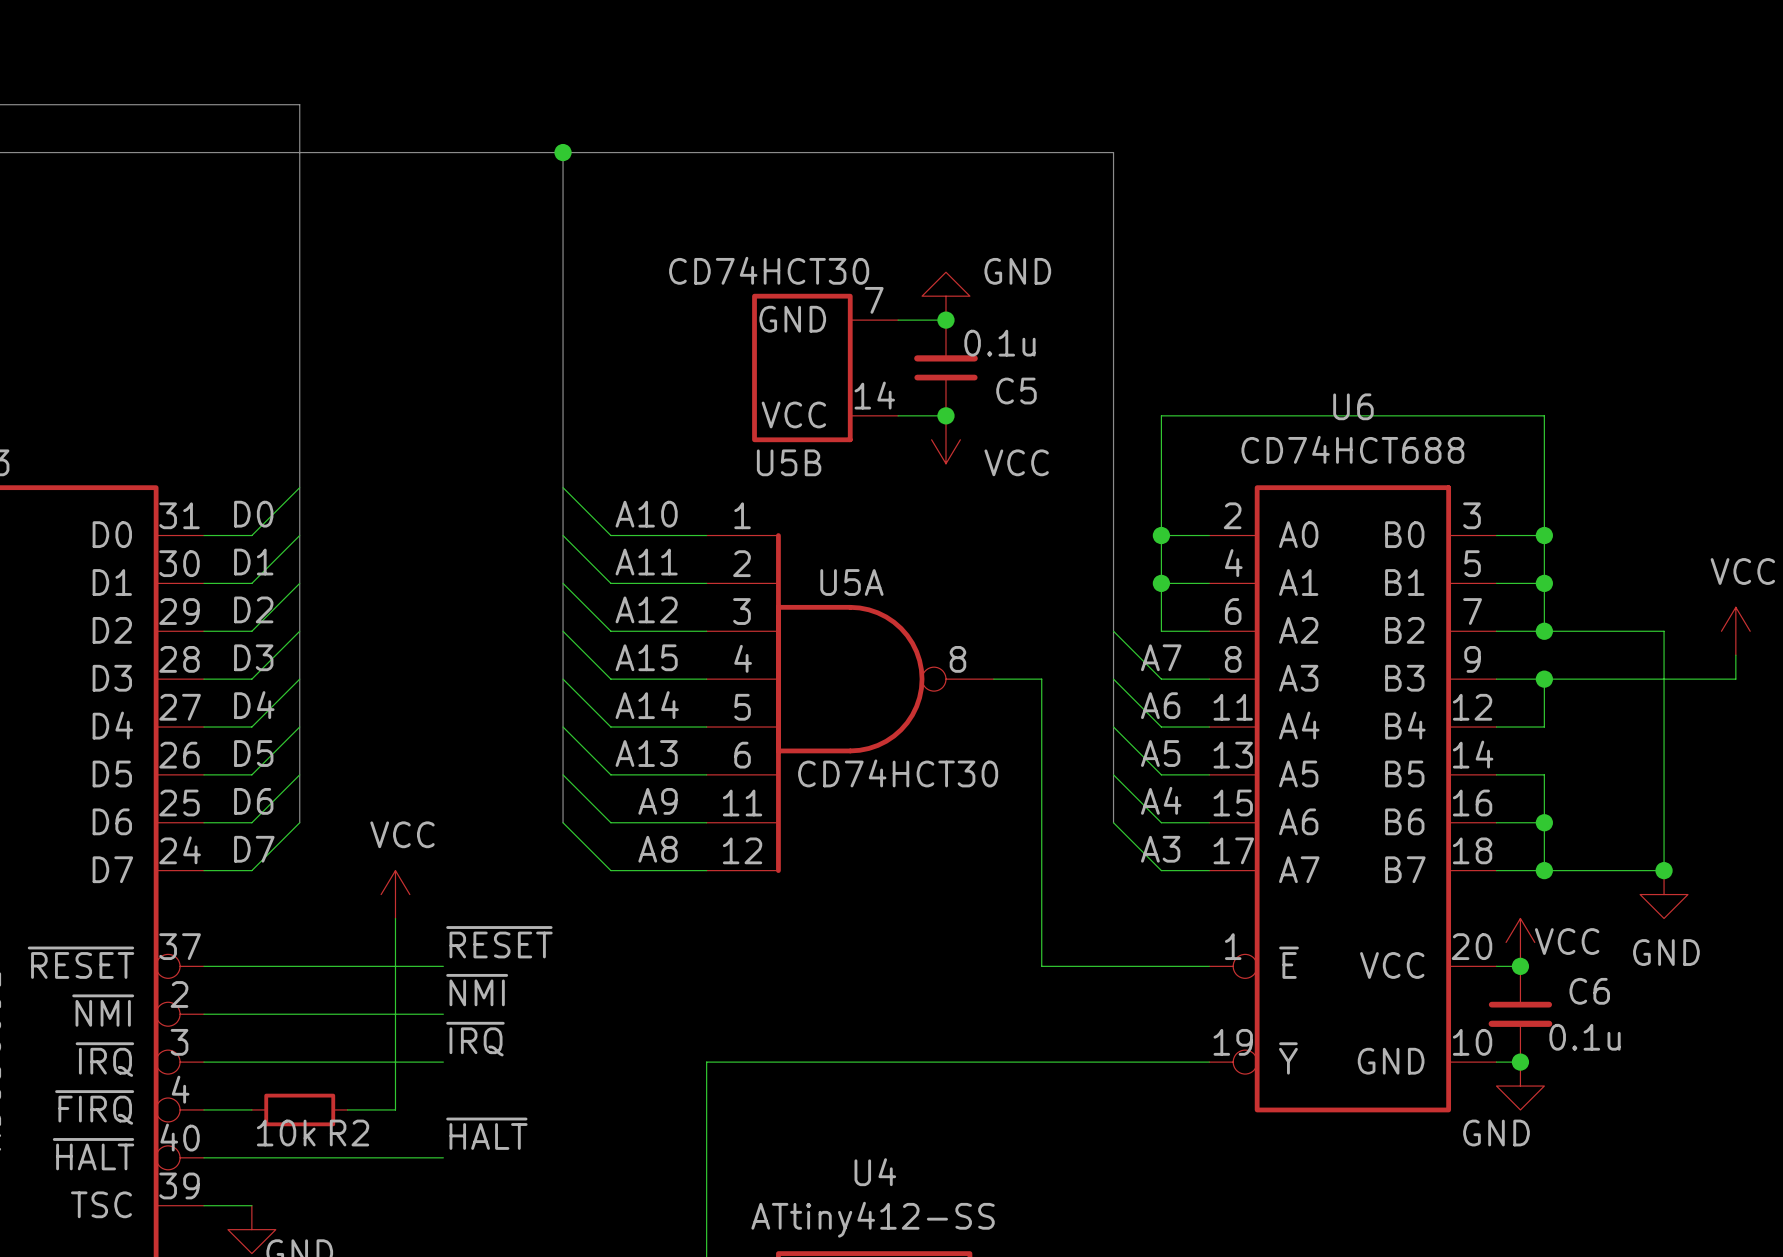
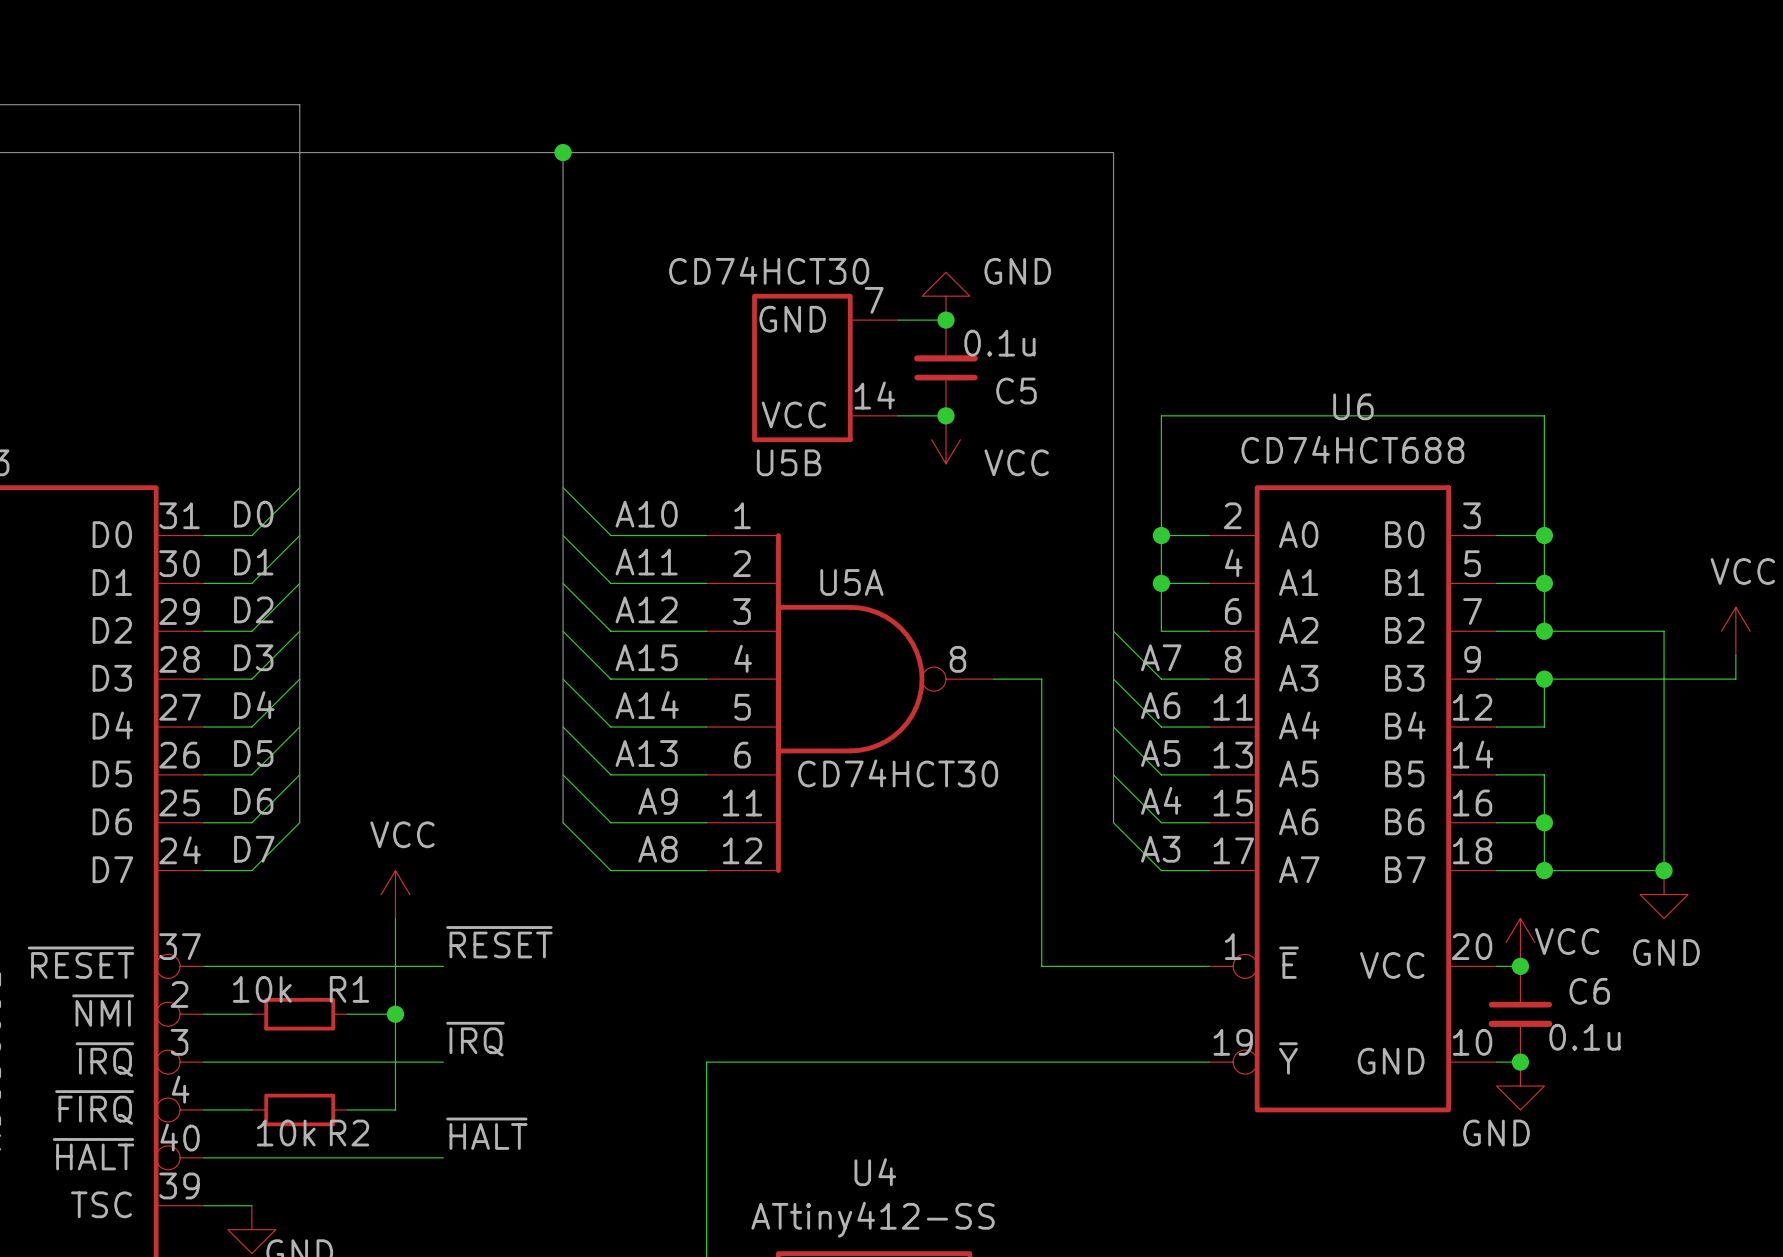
label: ~{NMI} (477, 990) -> none
wire: (251, 1014) (347, 1014) -> none
R1: none -> 10k (299, 1014)
wire: (395, 1014) (443, 1014) -> none
junction: none -> (395, 1014)

